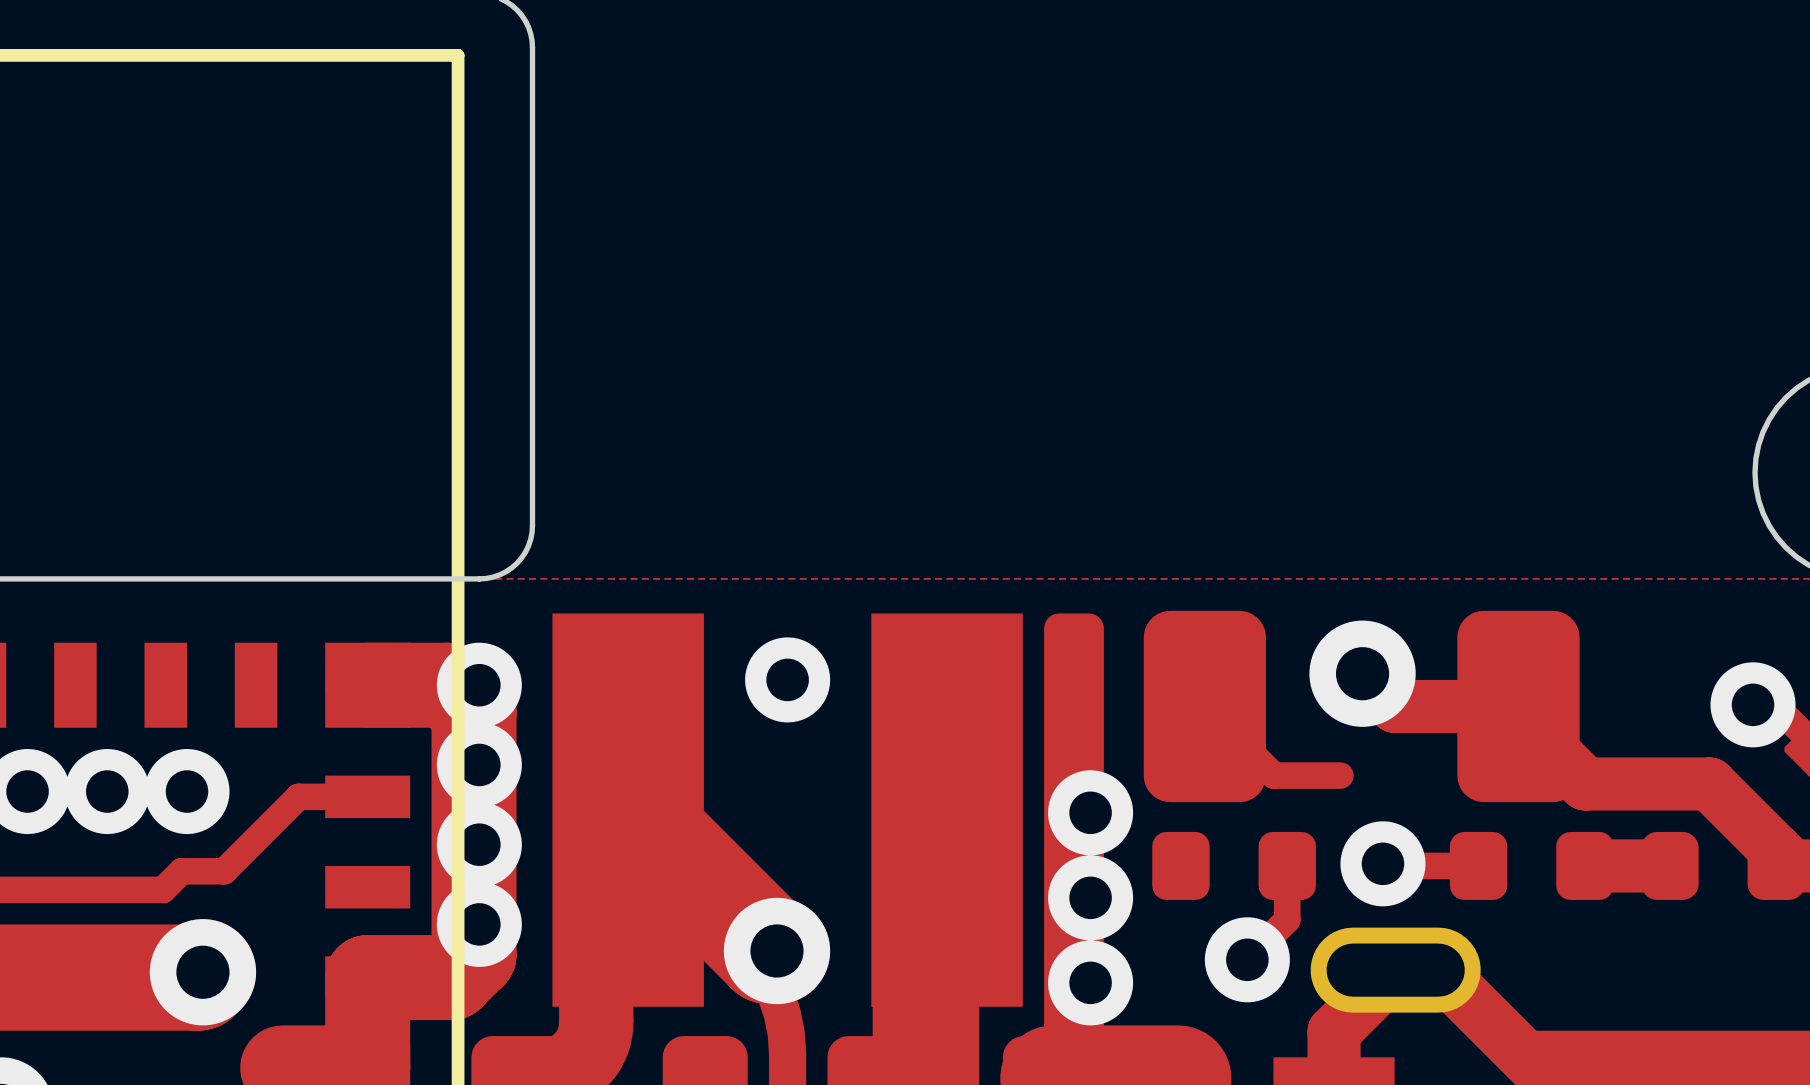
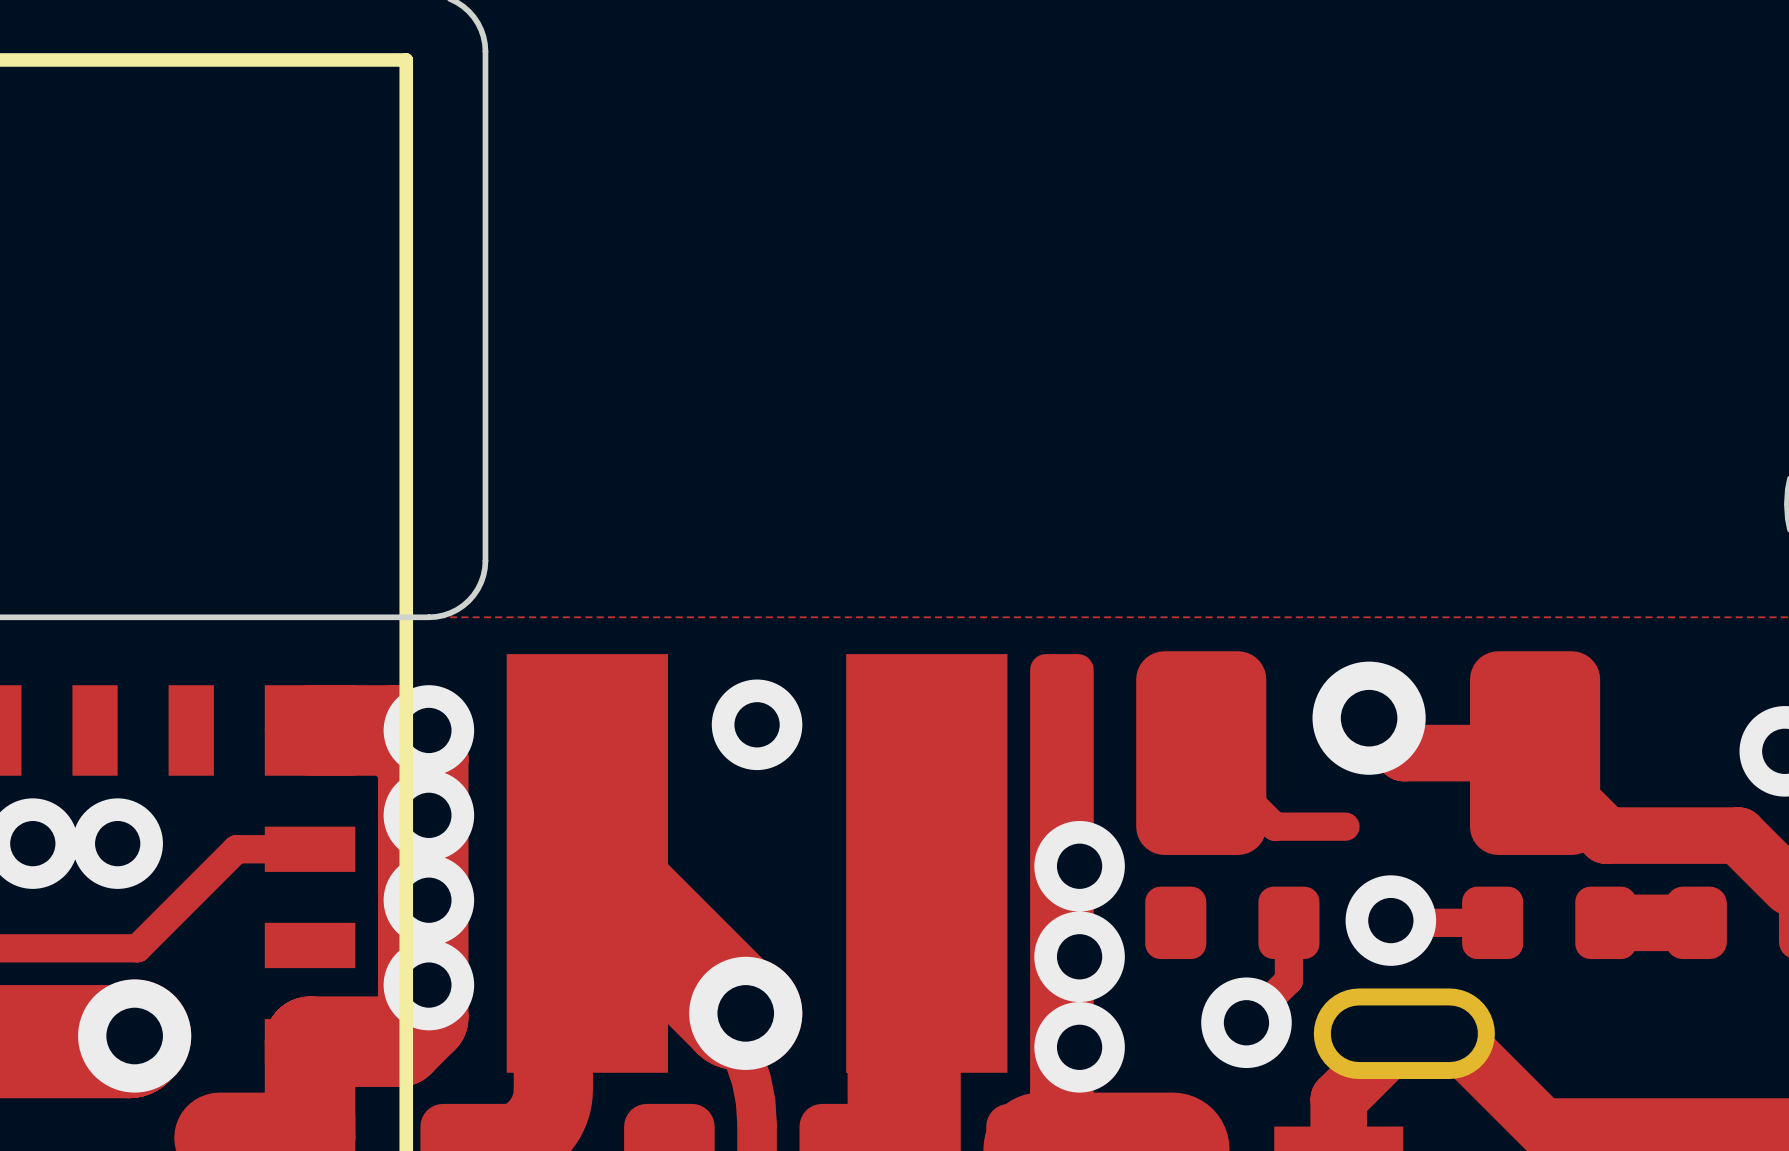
track: (224, 871) (181, 871) (163, 889) -> (157, 928) (137, 948) (92, 948)

